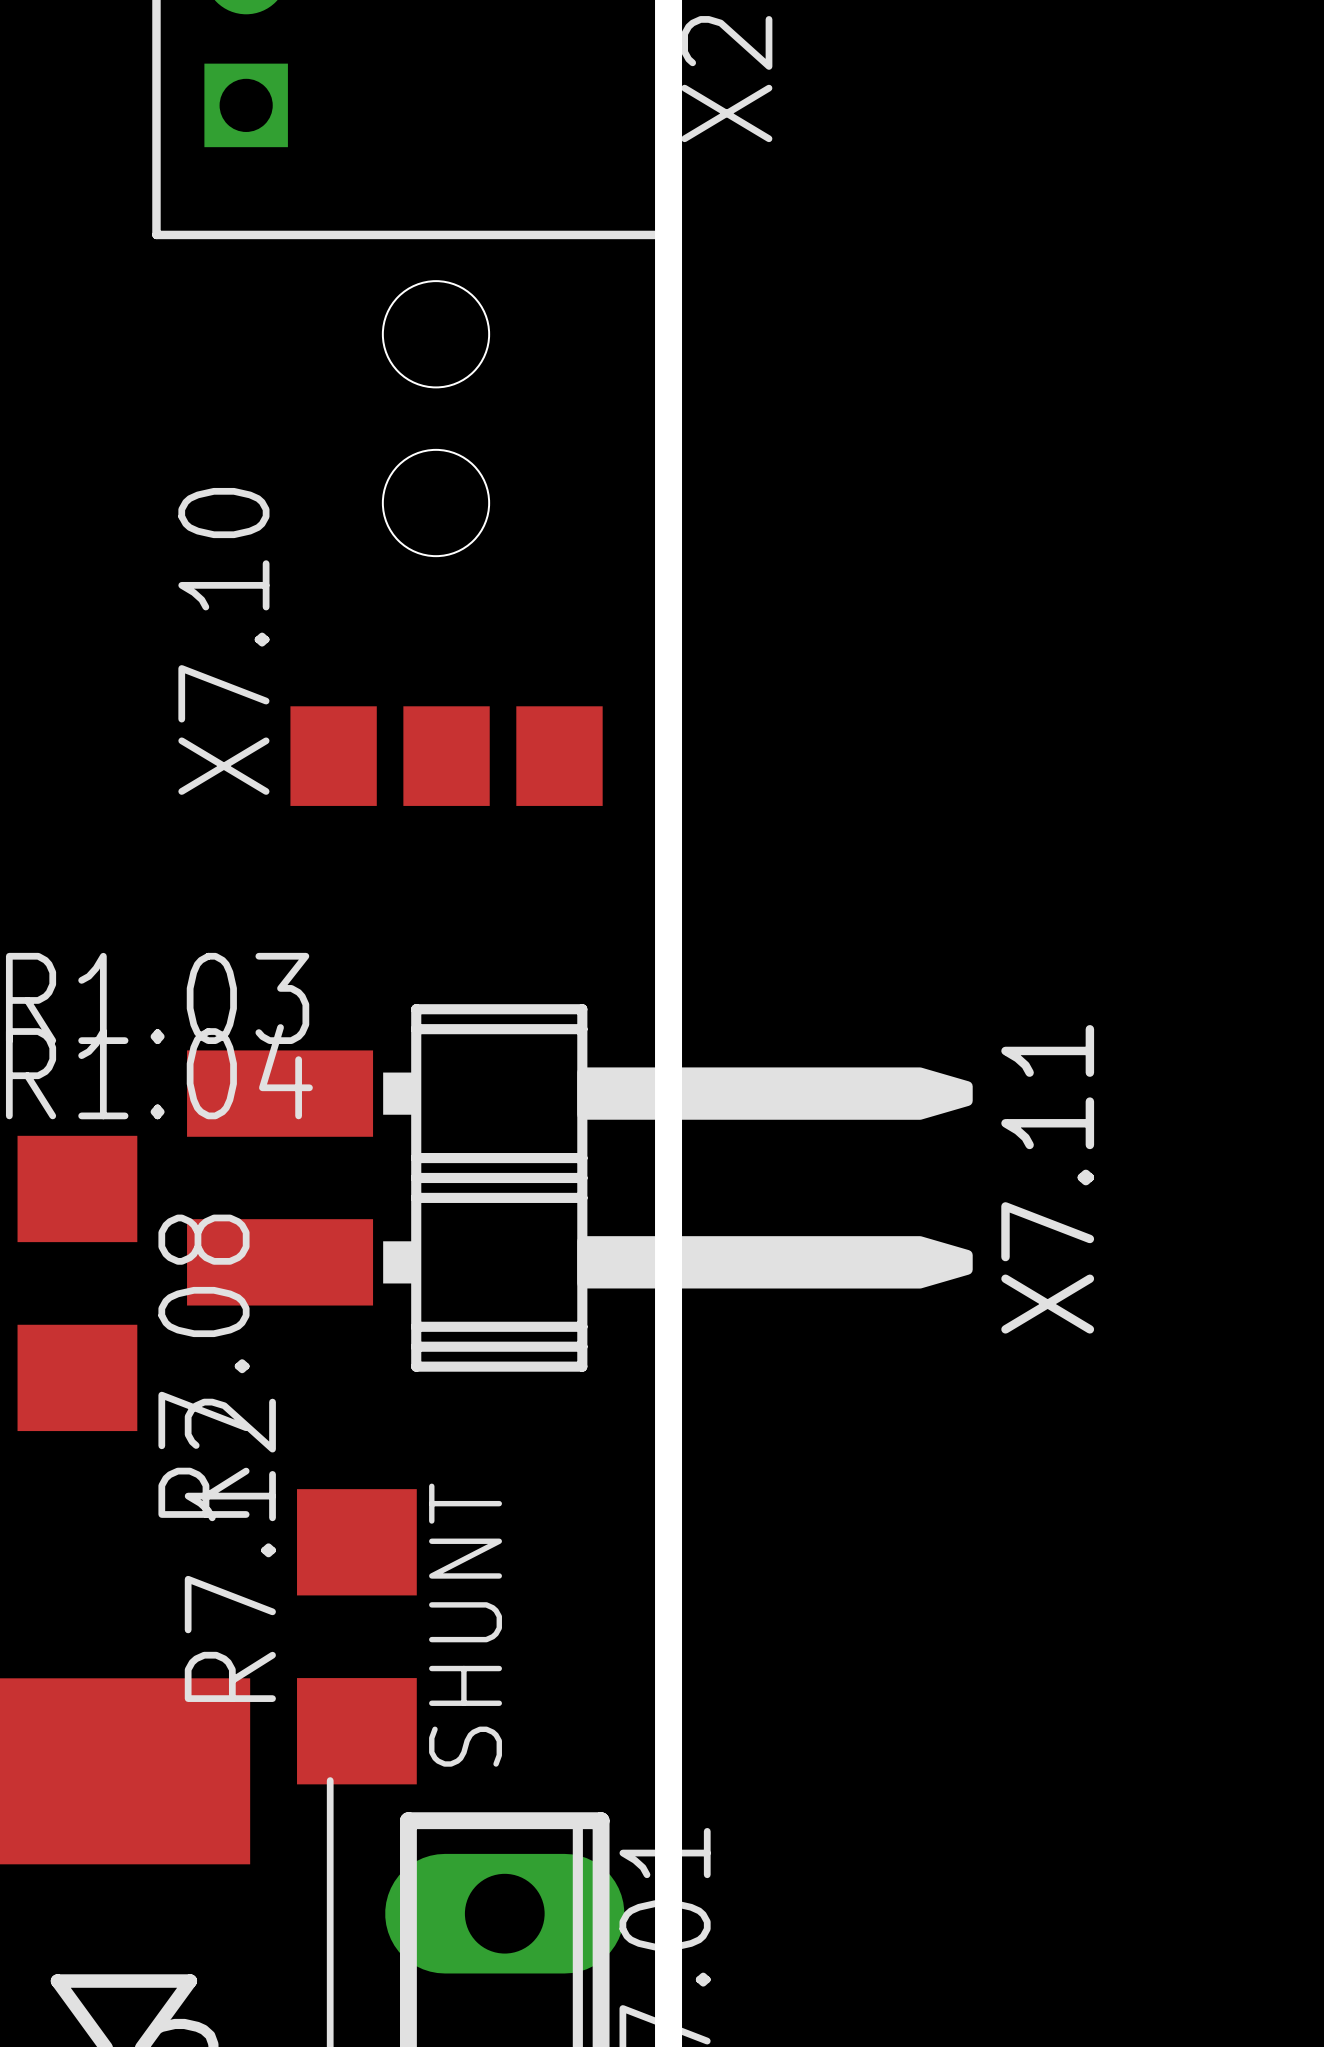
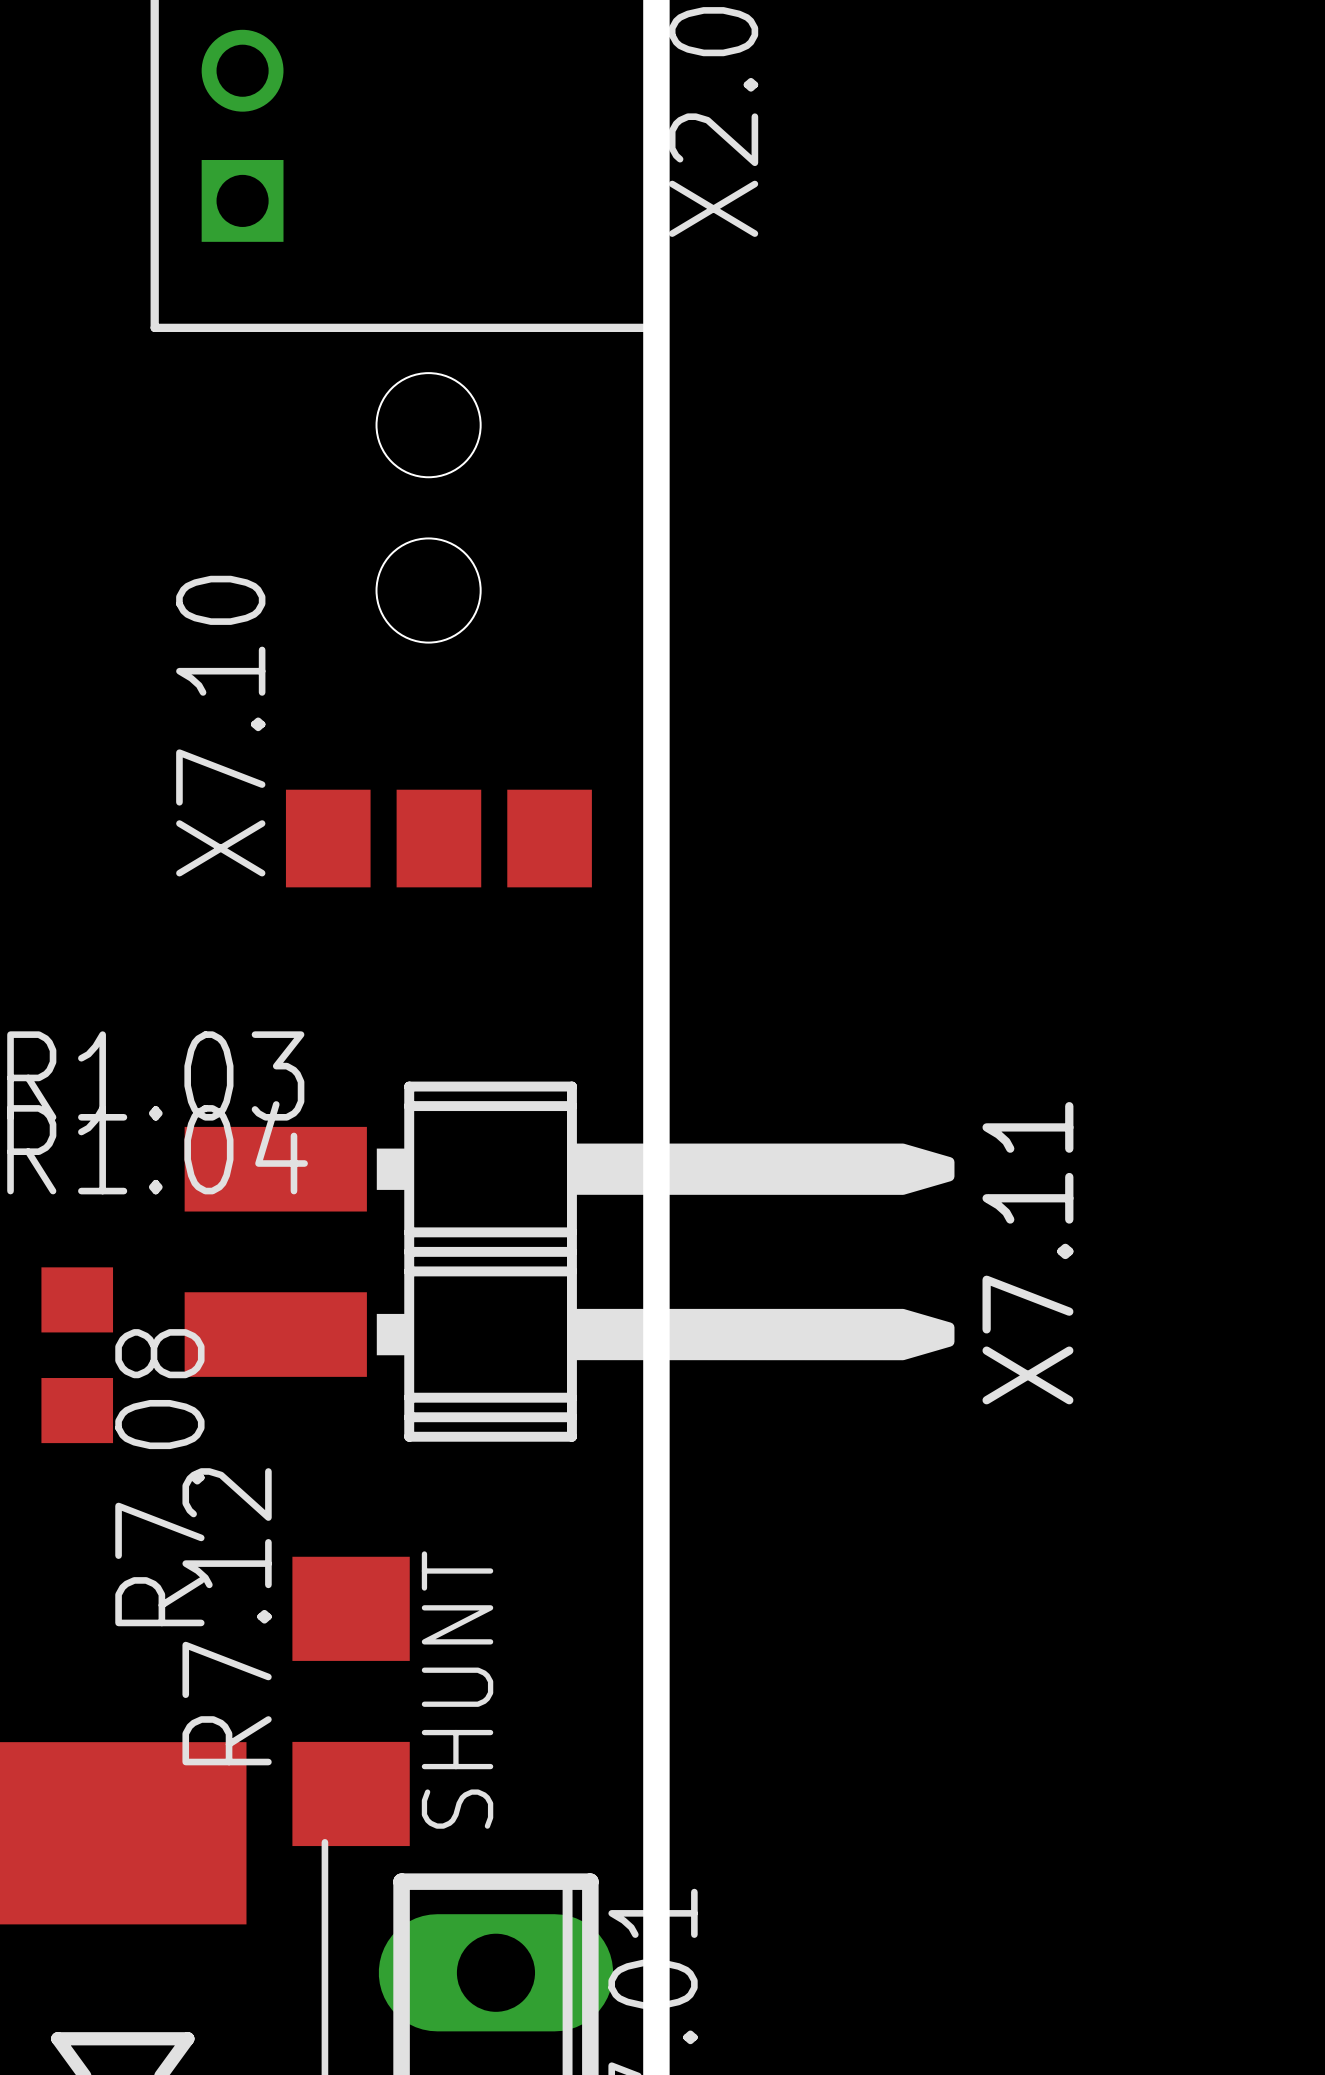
R7.08 footprint: [17, 1135, 138, 1432] -> [41, 1267, 114, 1444]
R7.08 name position: R7.08 (203, 1366) -> R7.08 (159, 1477)

